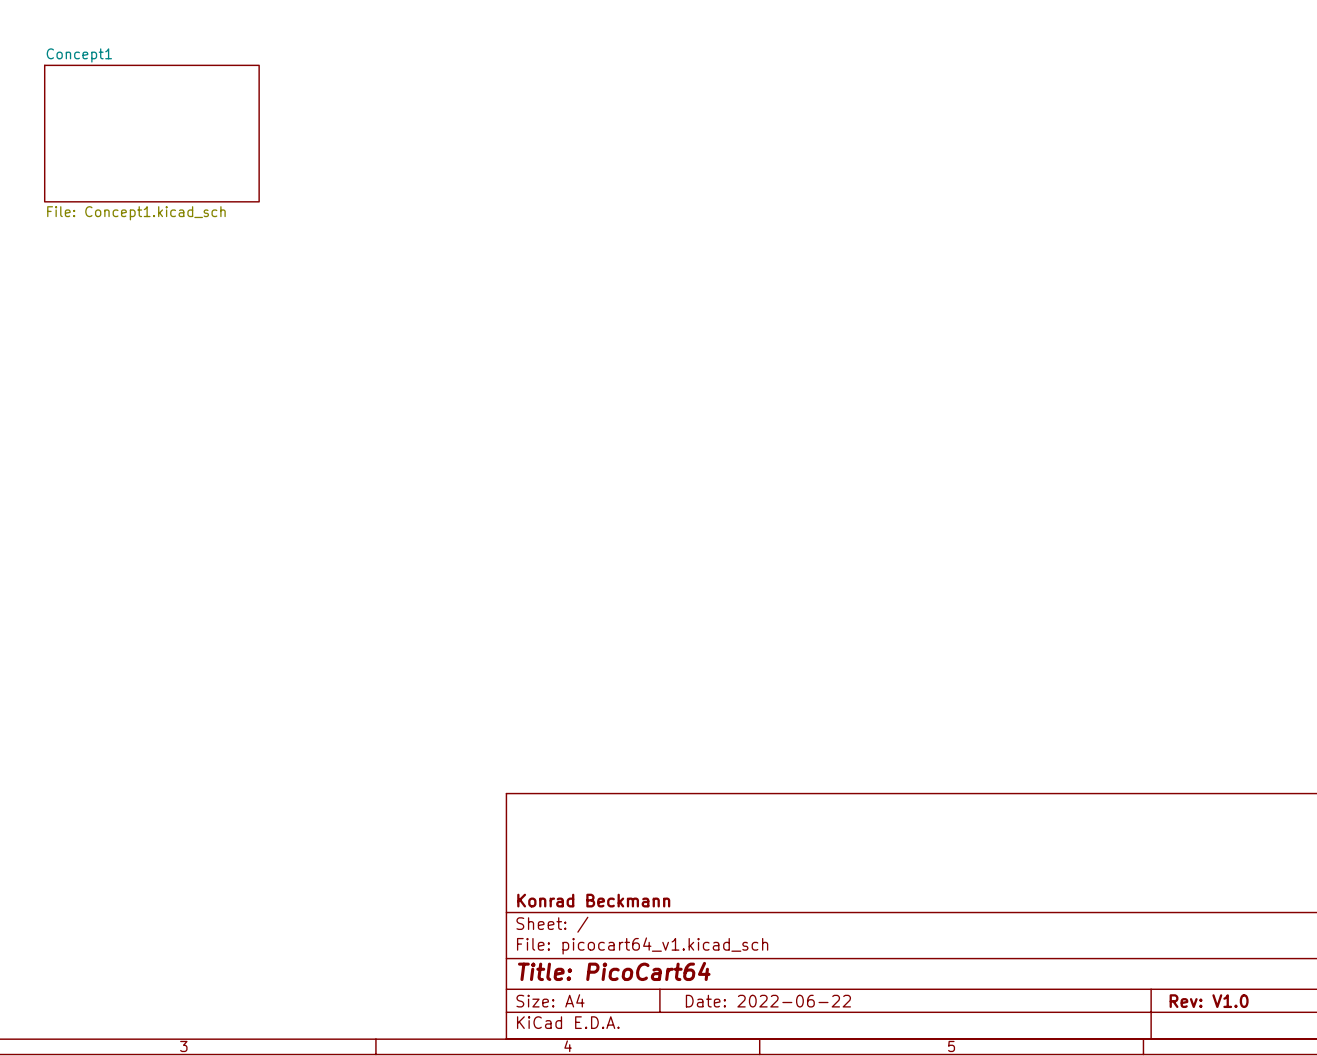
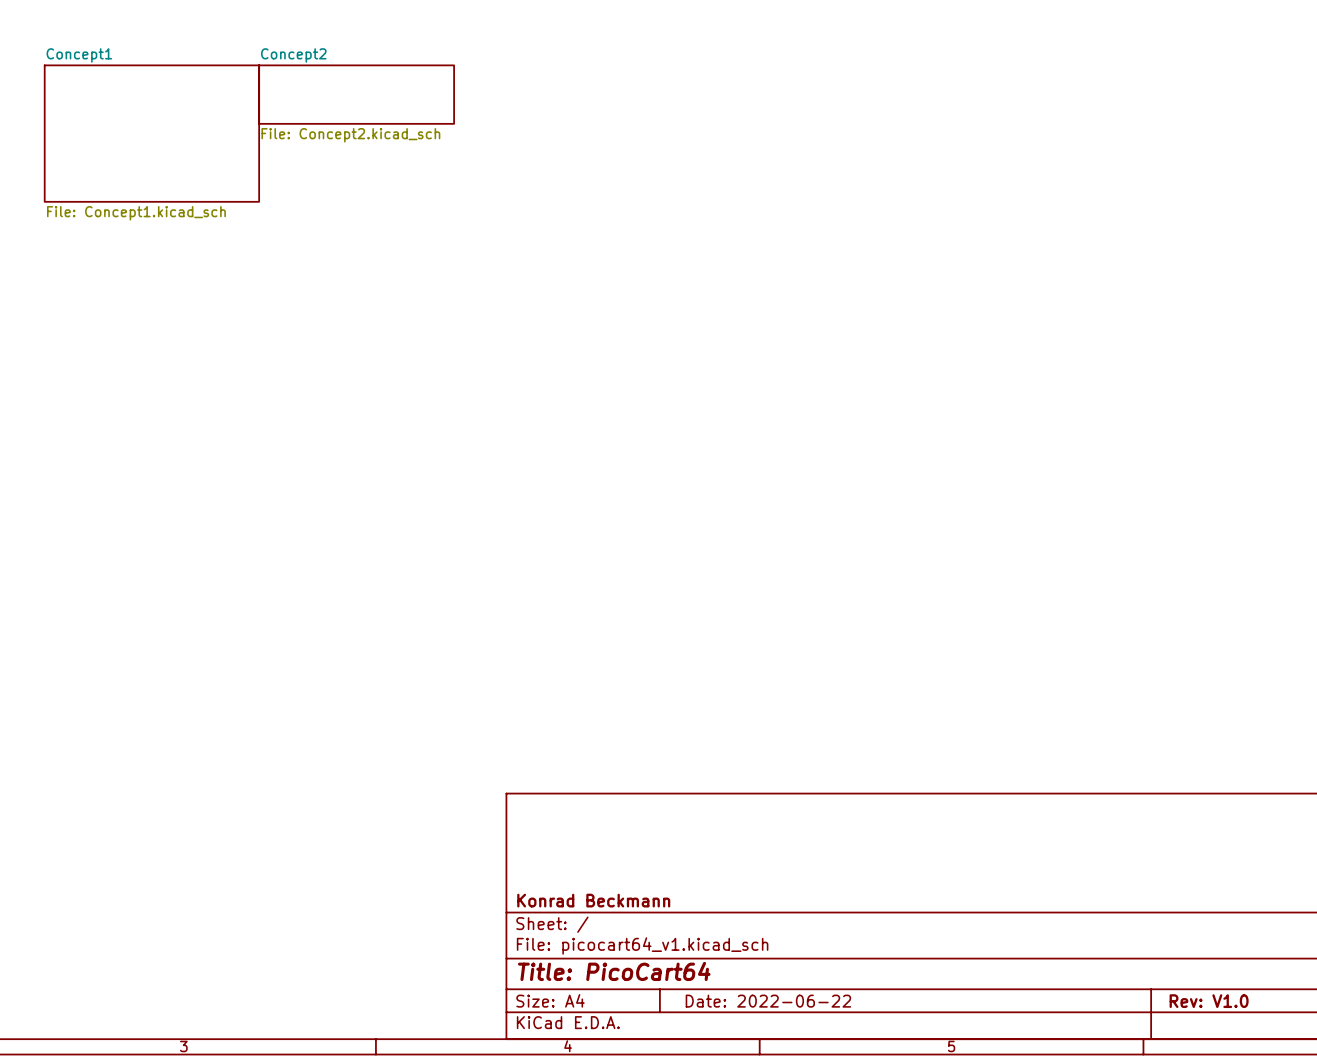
sheet Concept2: none -> File: Concept2.kicad_sch (356, 94)

